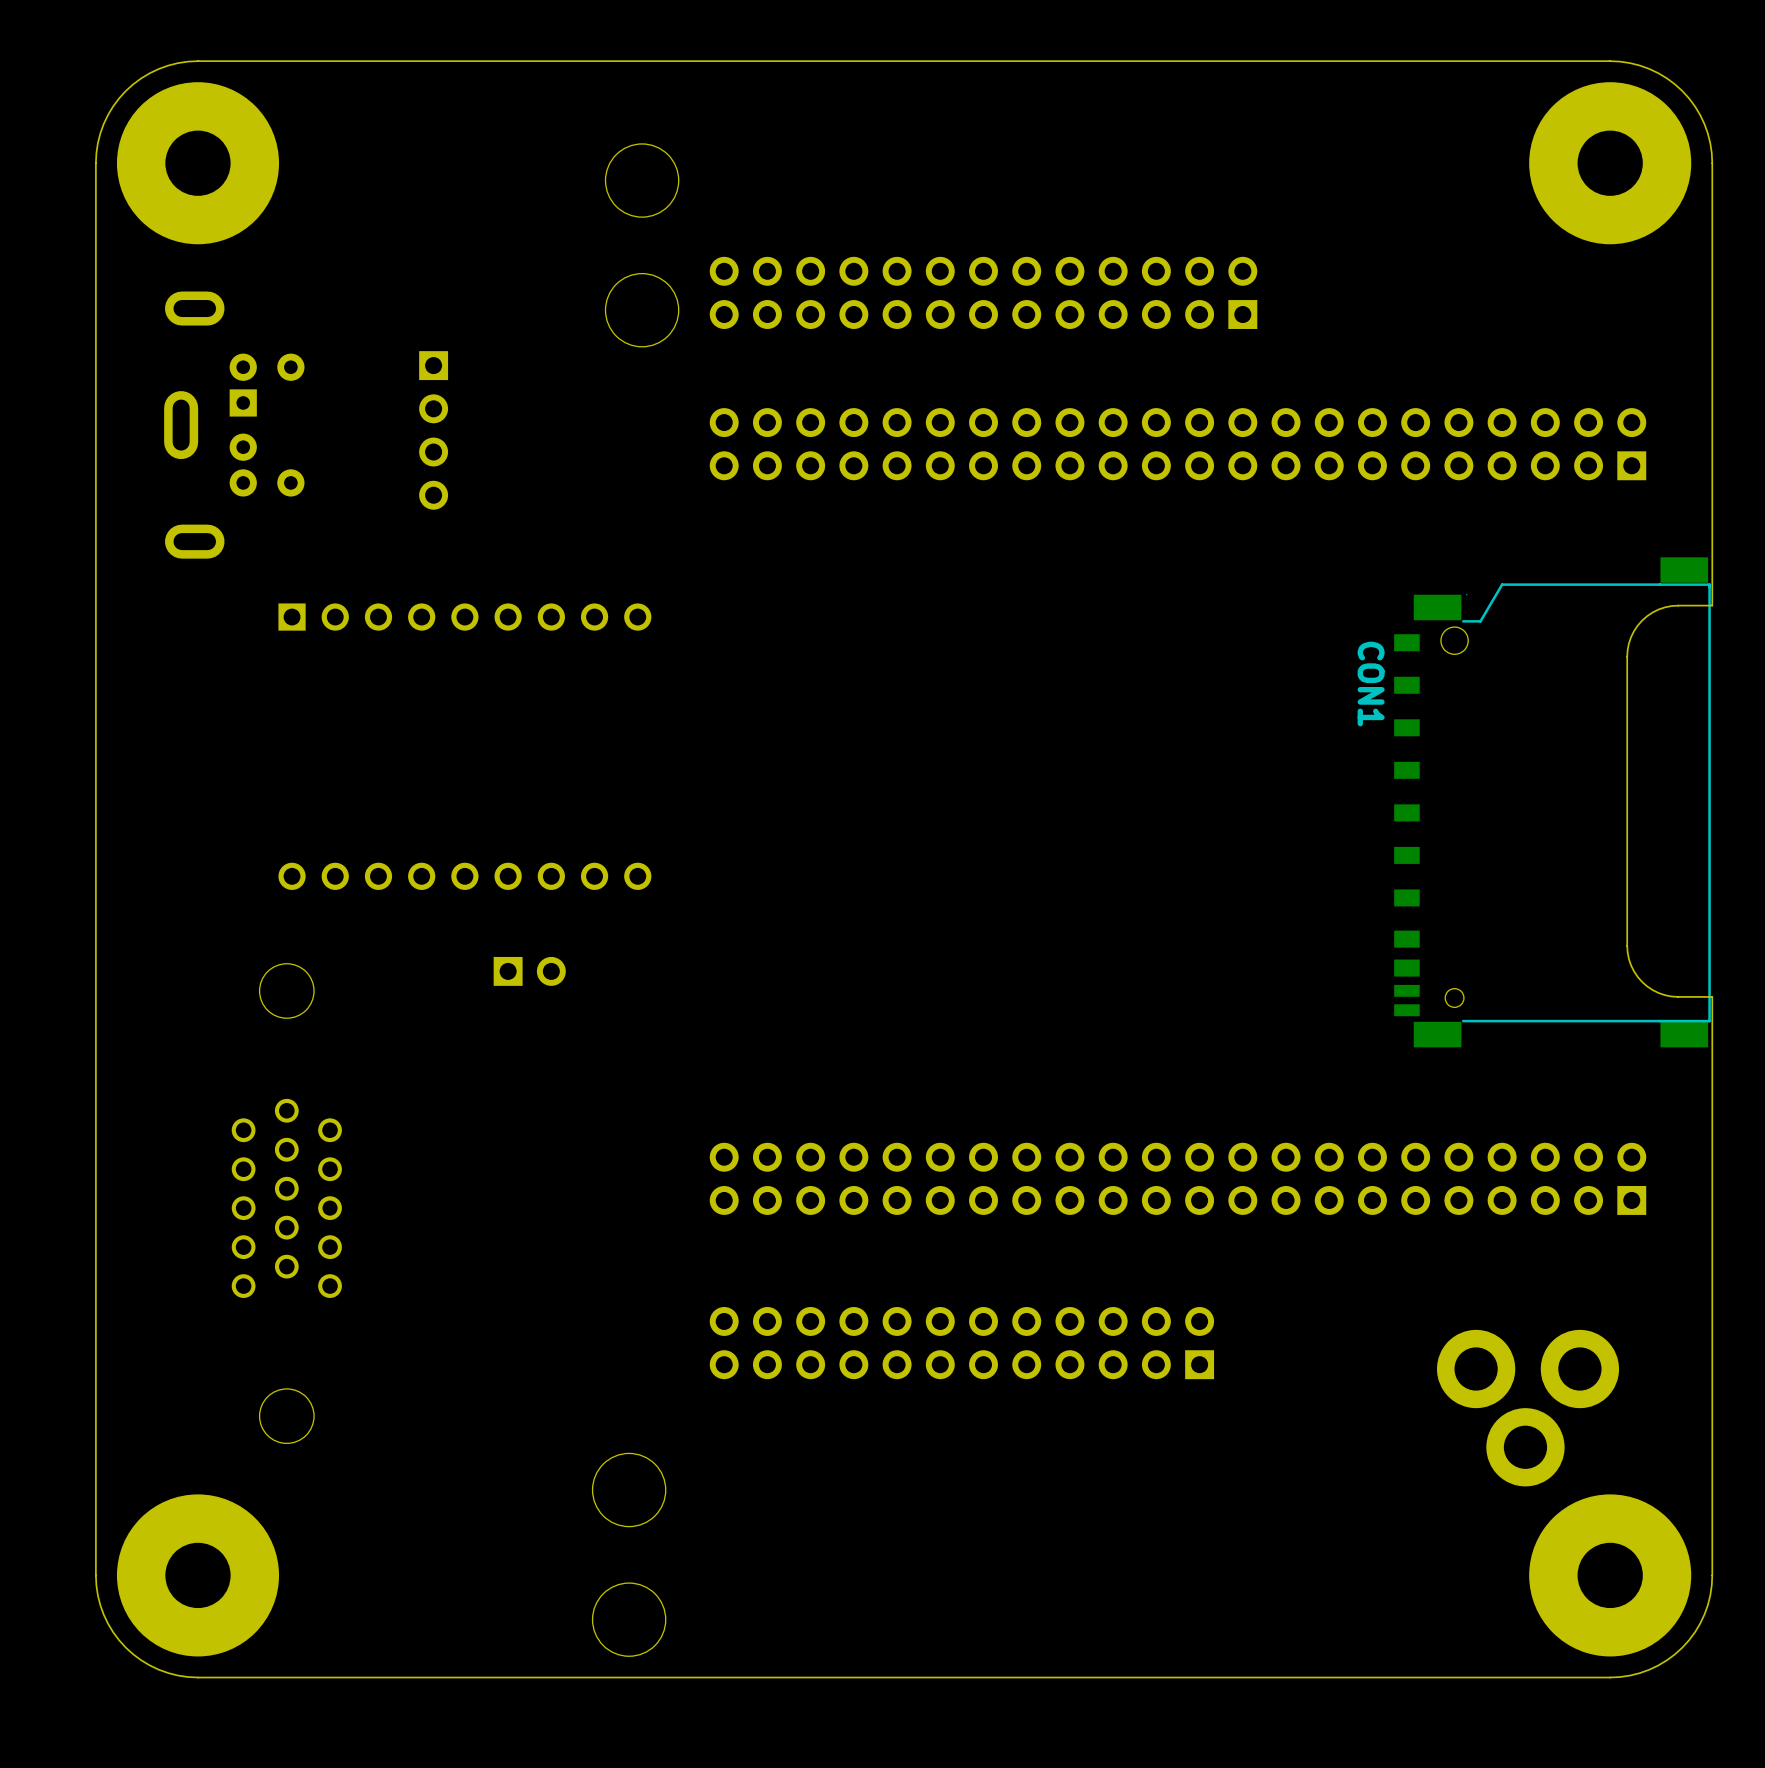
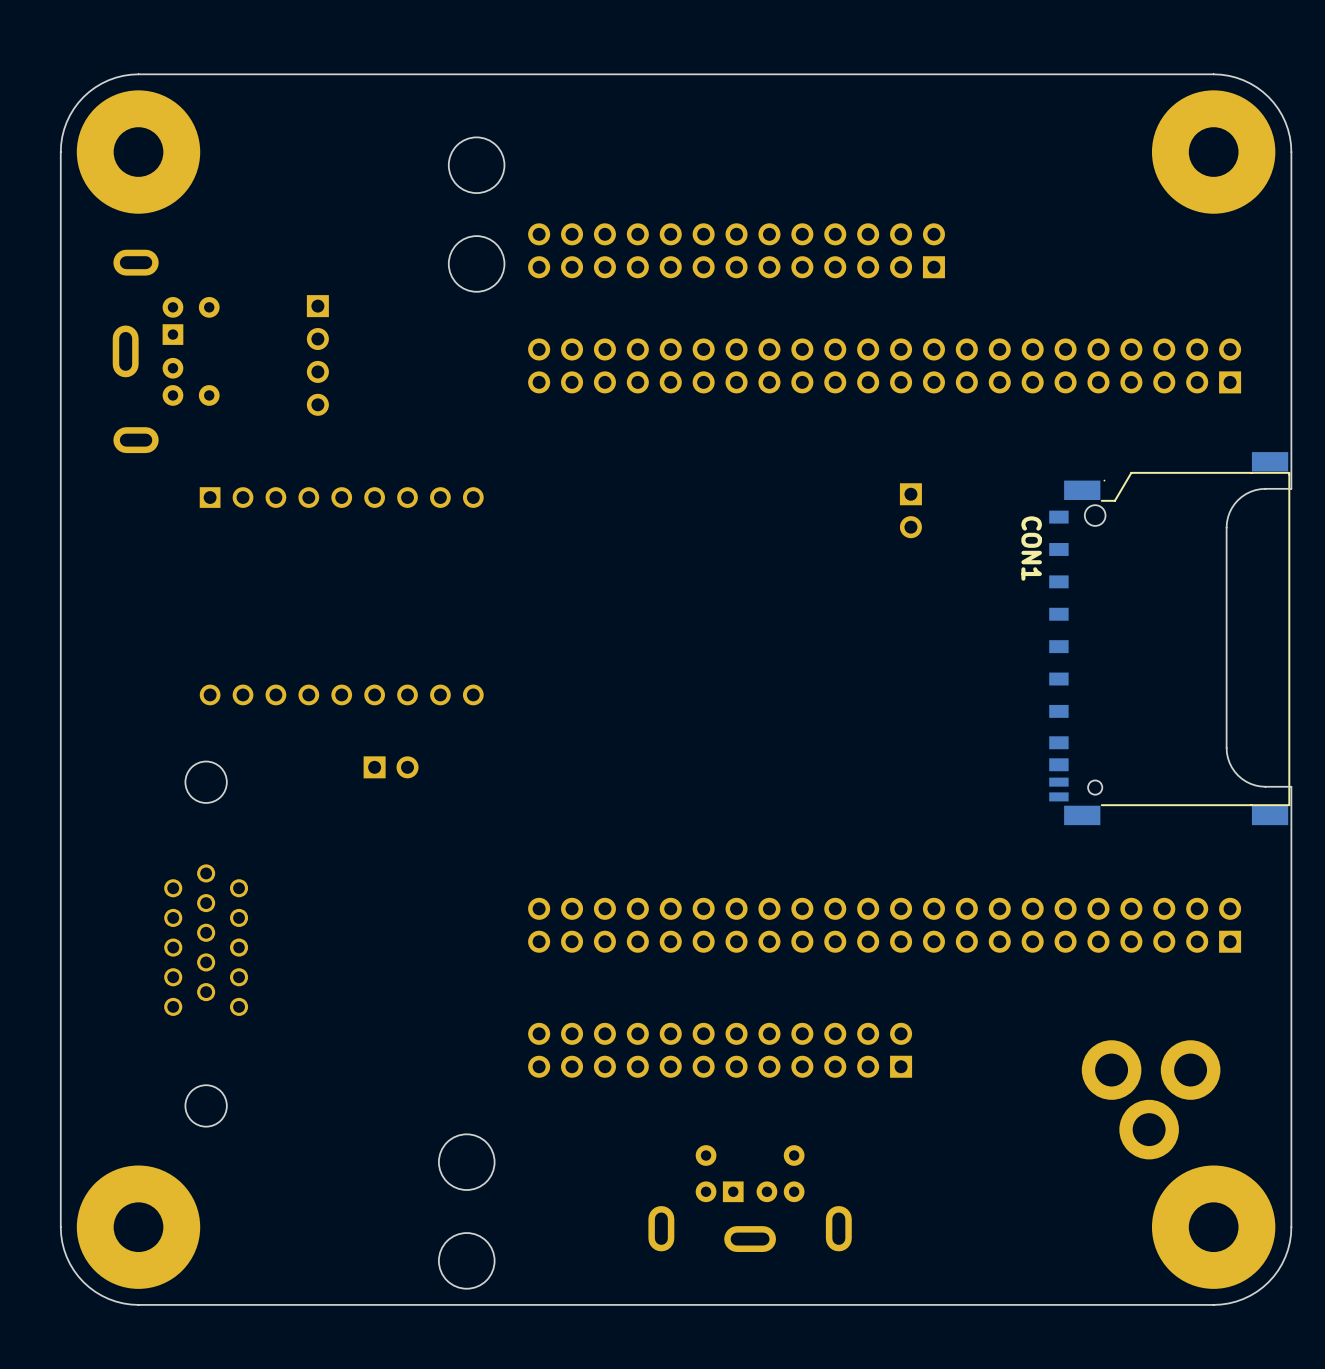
part: none -> (910, 510)
part: none -> (750, 1198)

